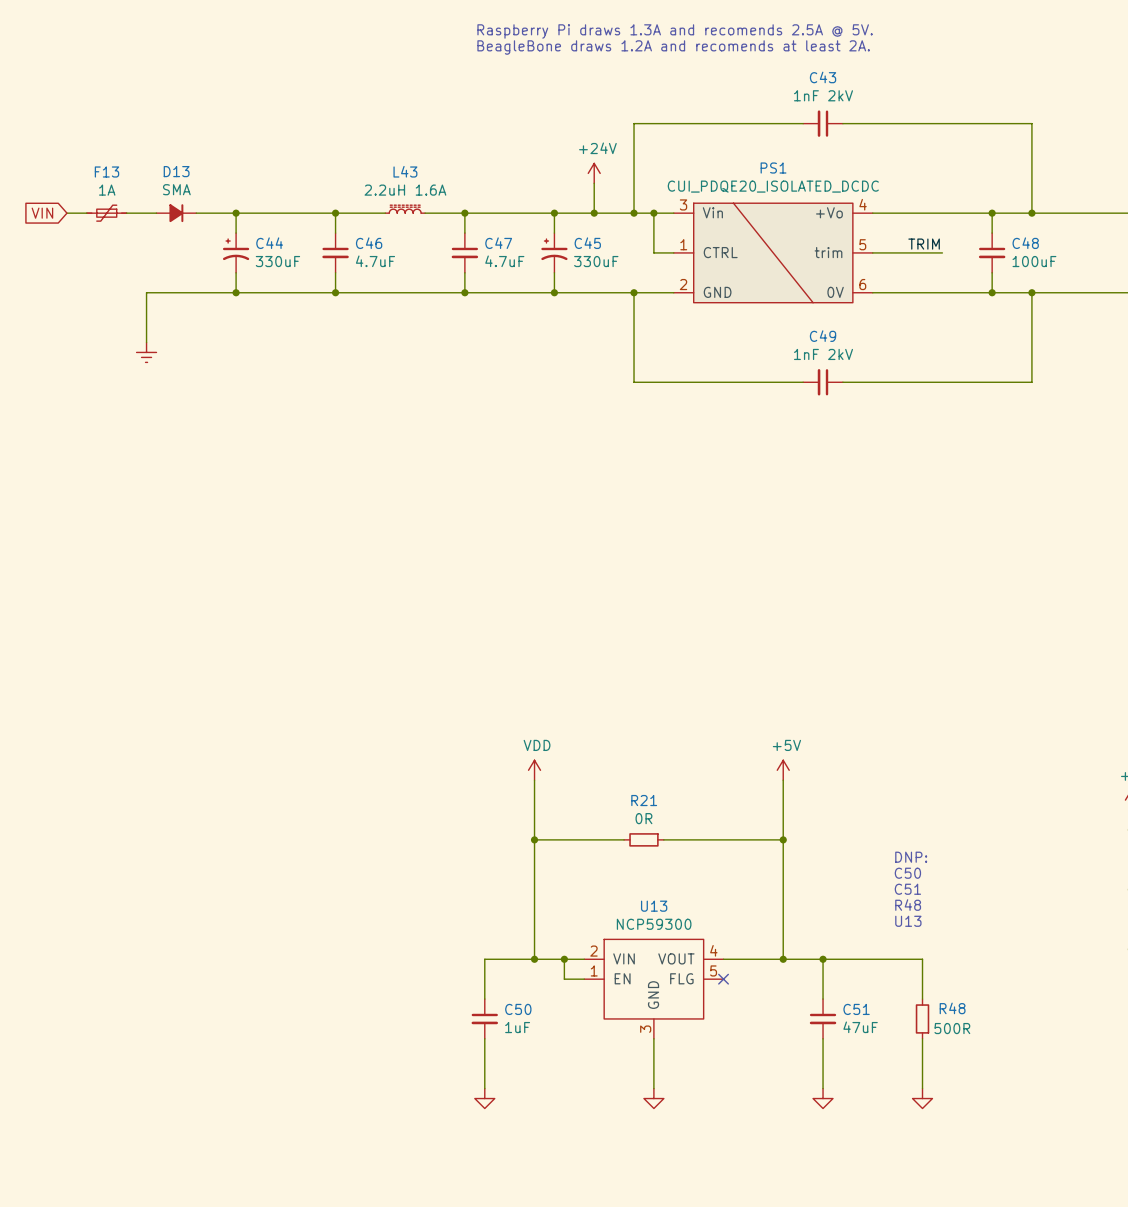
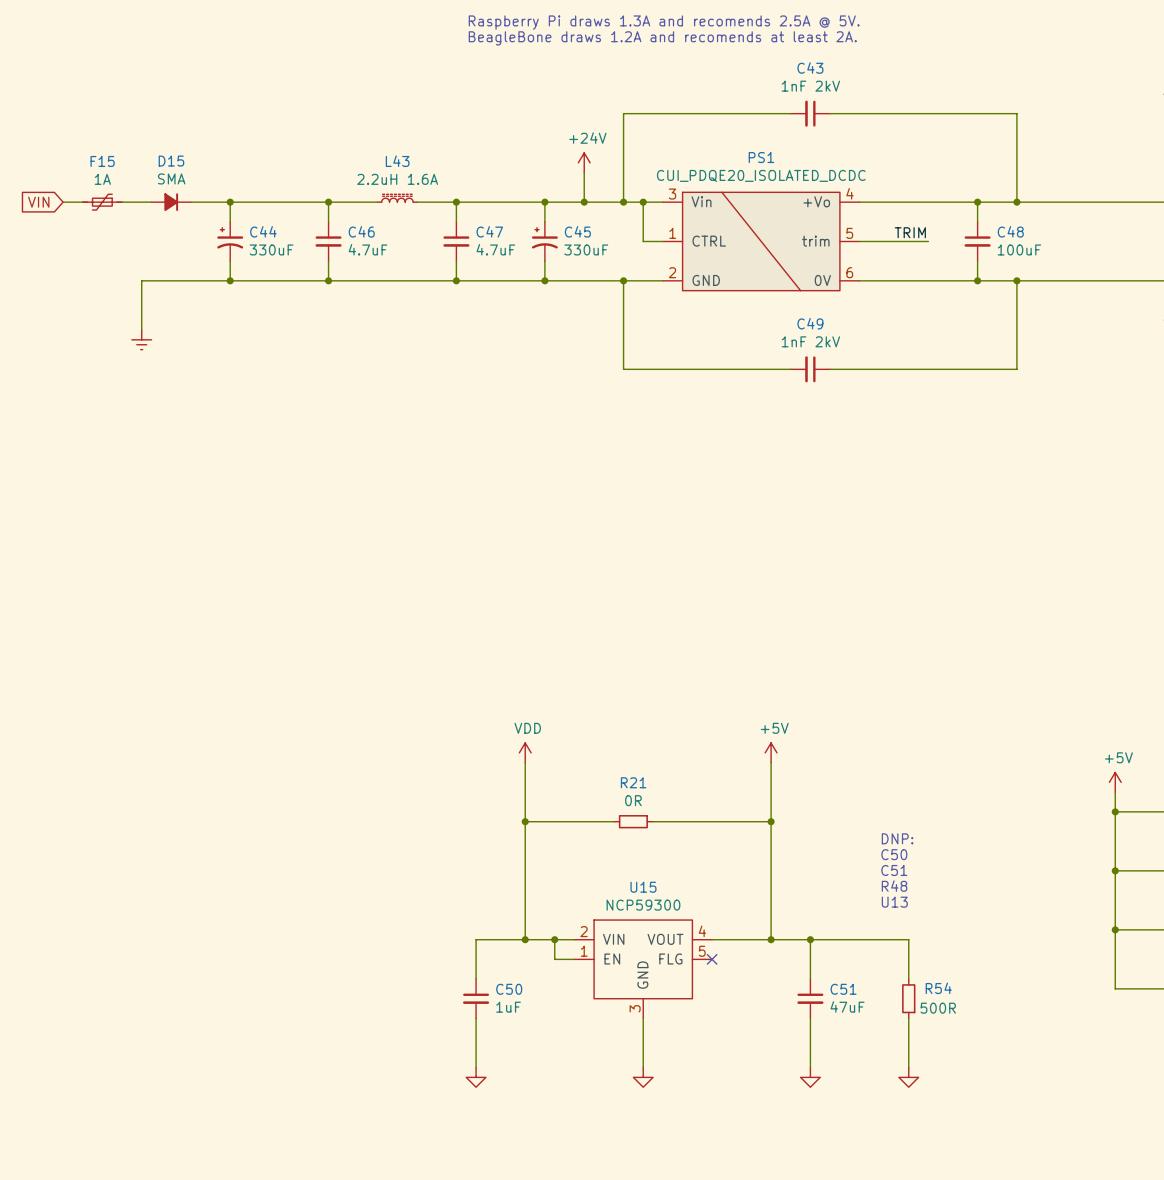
D13 name: D13 (176, 171) -> D15 (171, 161)
F13 name: F13 (106, 172) -> F15 (102, 161)
U13 name: U13 (654, 906) -> U15 (643, 887)
R48 name: R48 (952, 1008) -> R54 (938, 988)

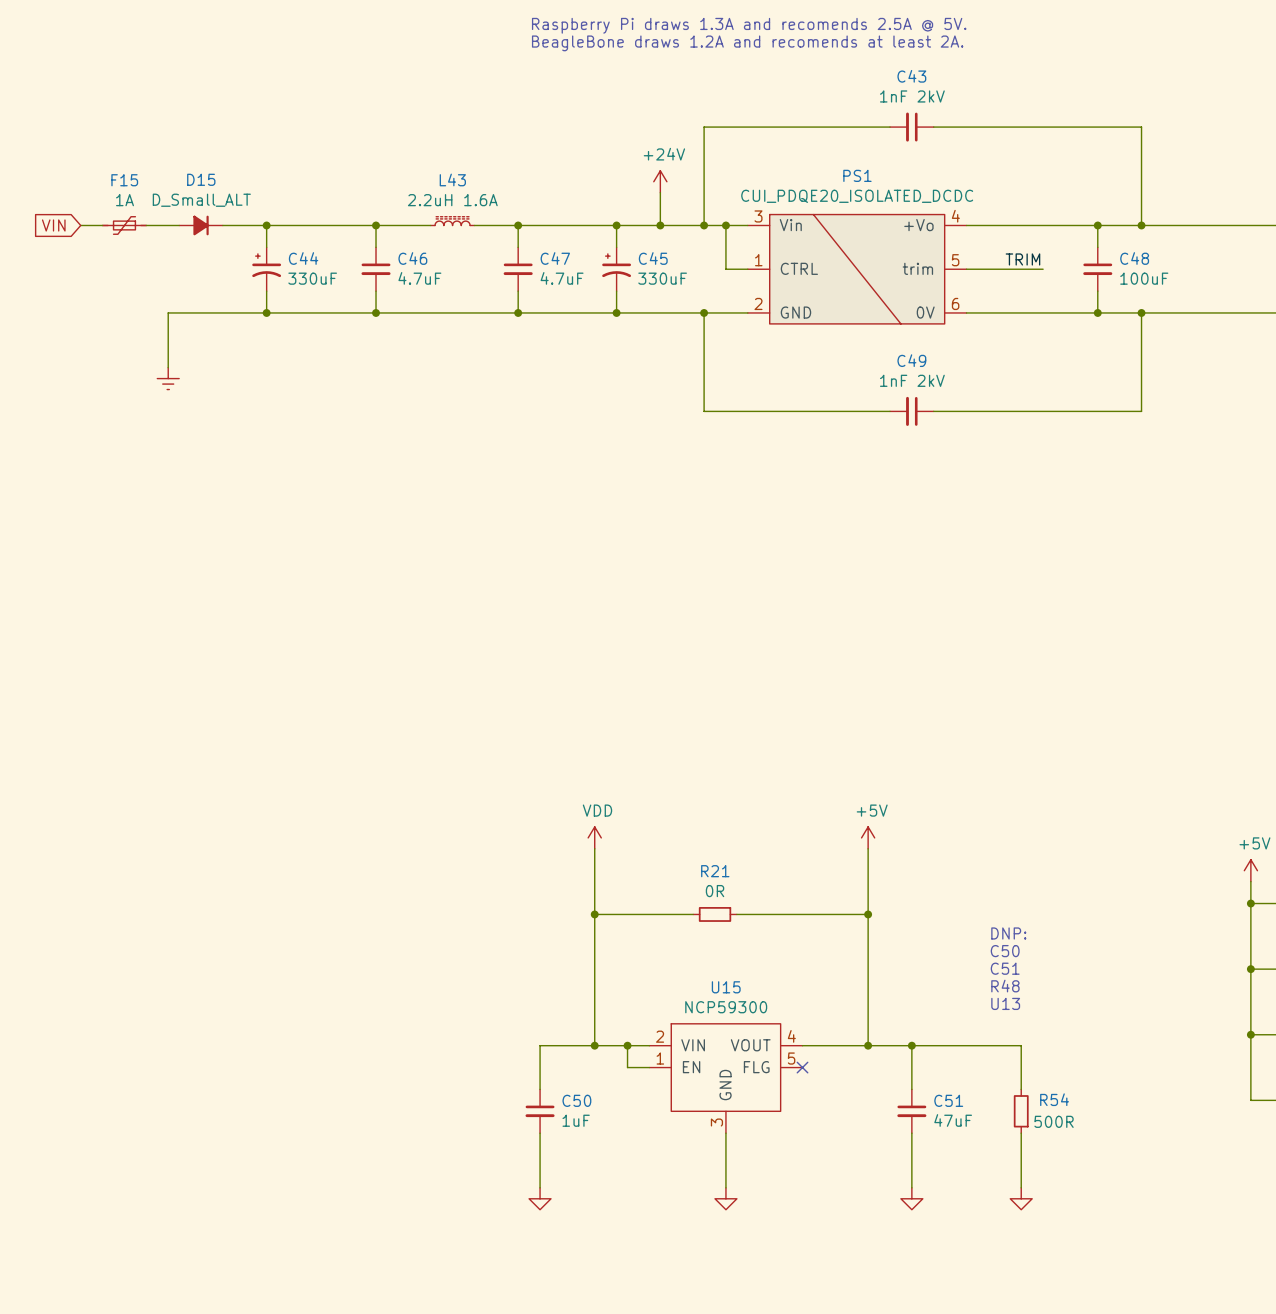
D15 value: SMA (171, 178) -> D_Small_ALT (201, 200)

